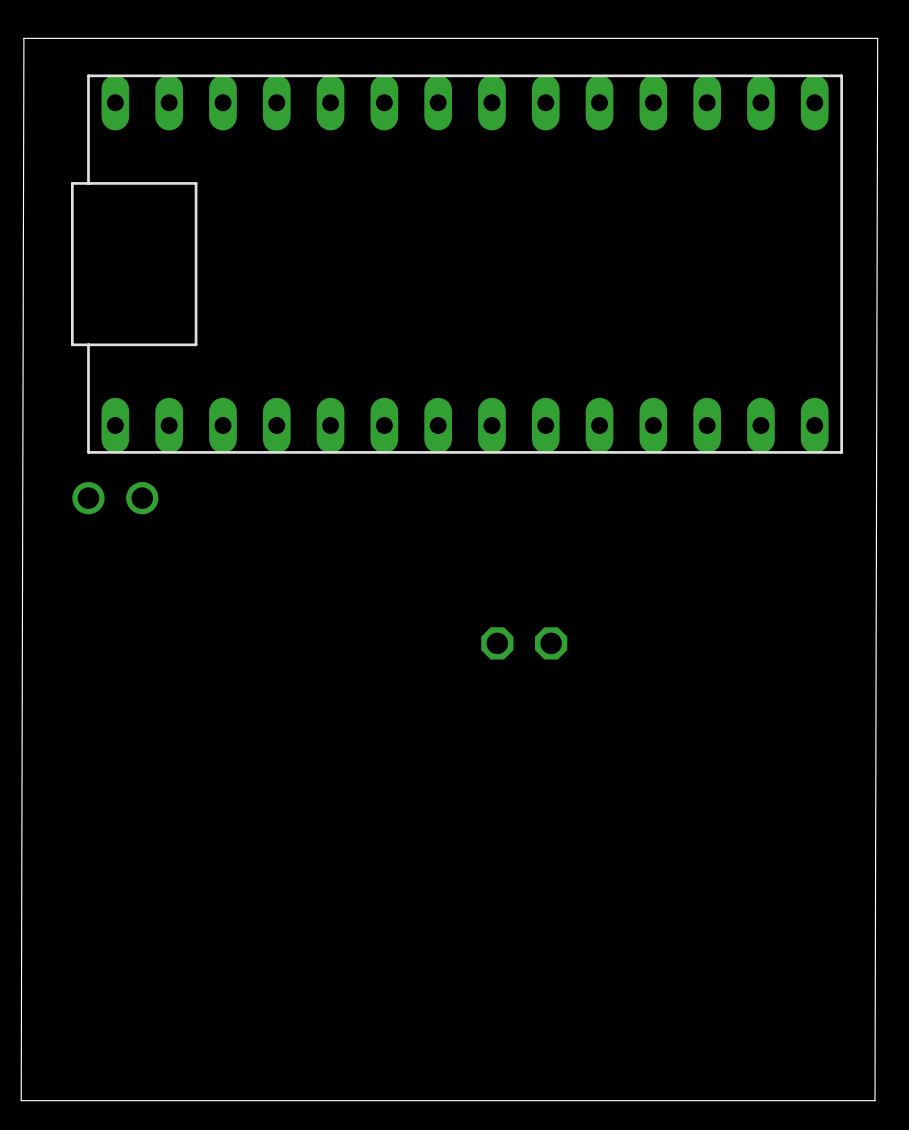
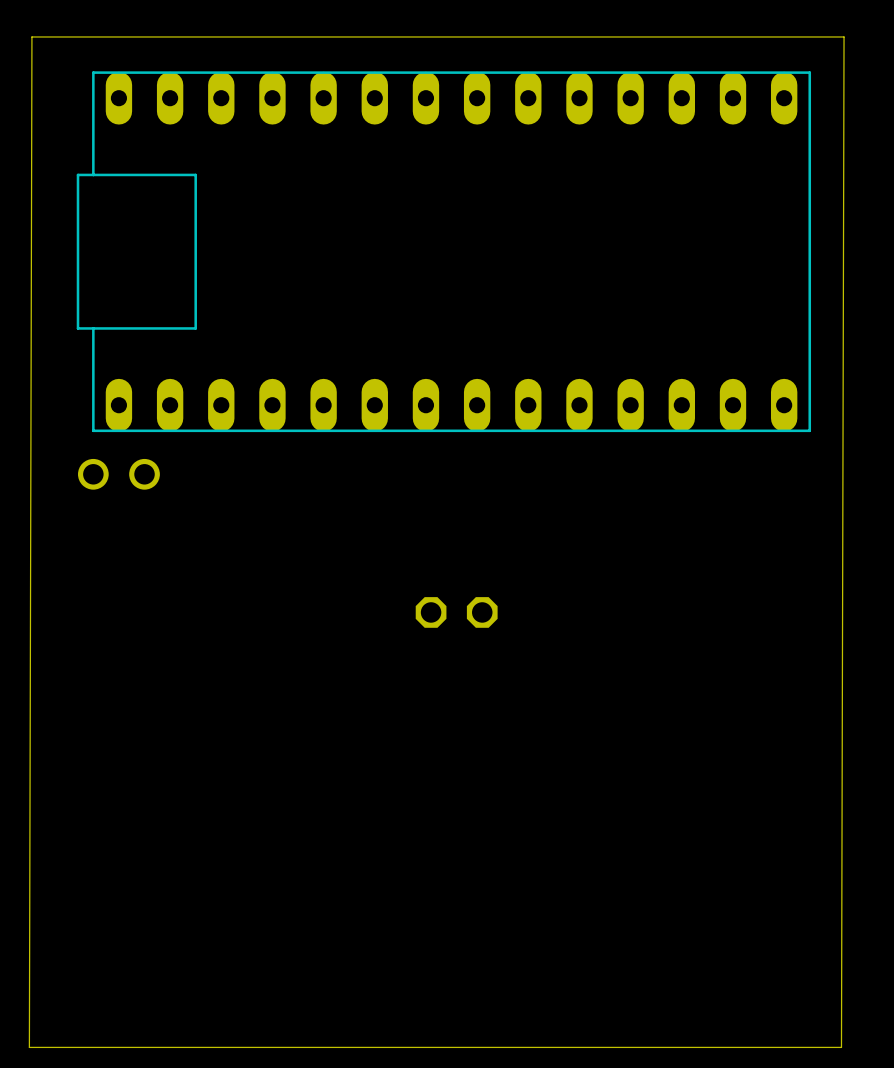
part position: (524, 643) -> (456, 612)

